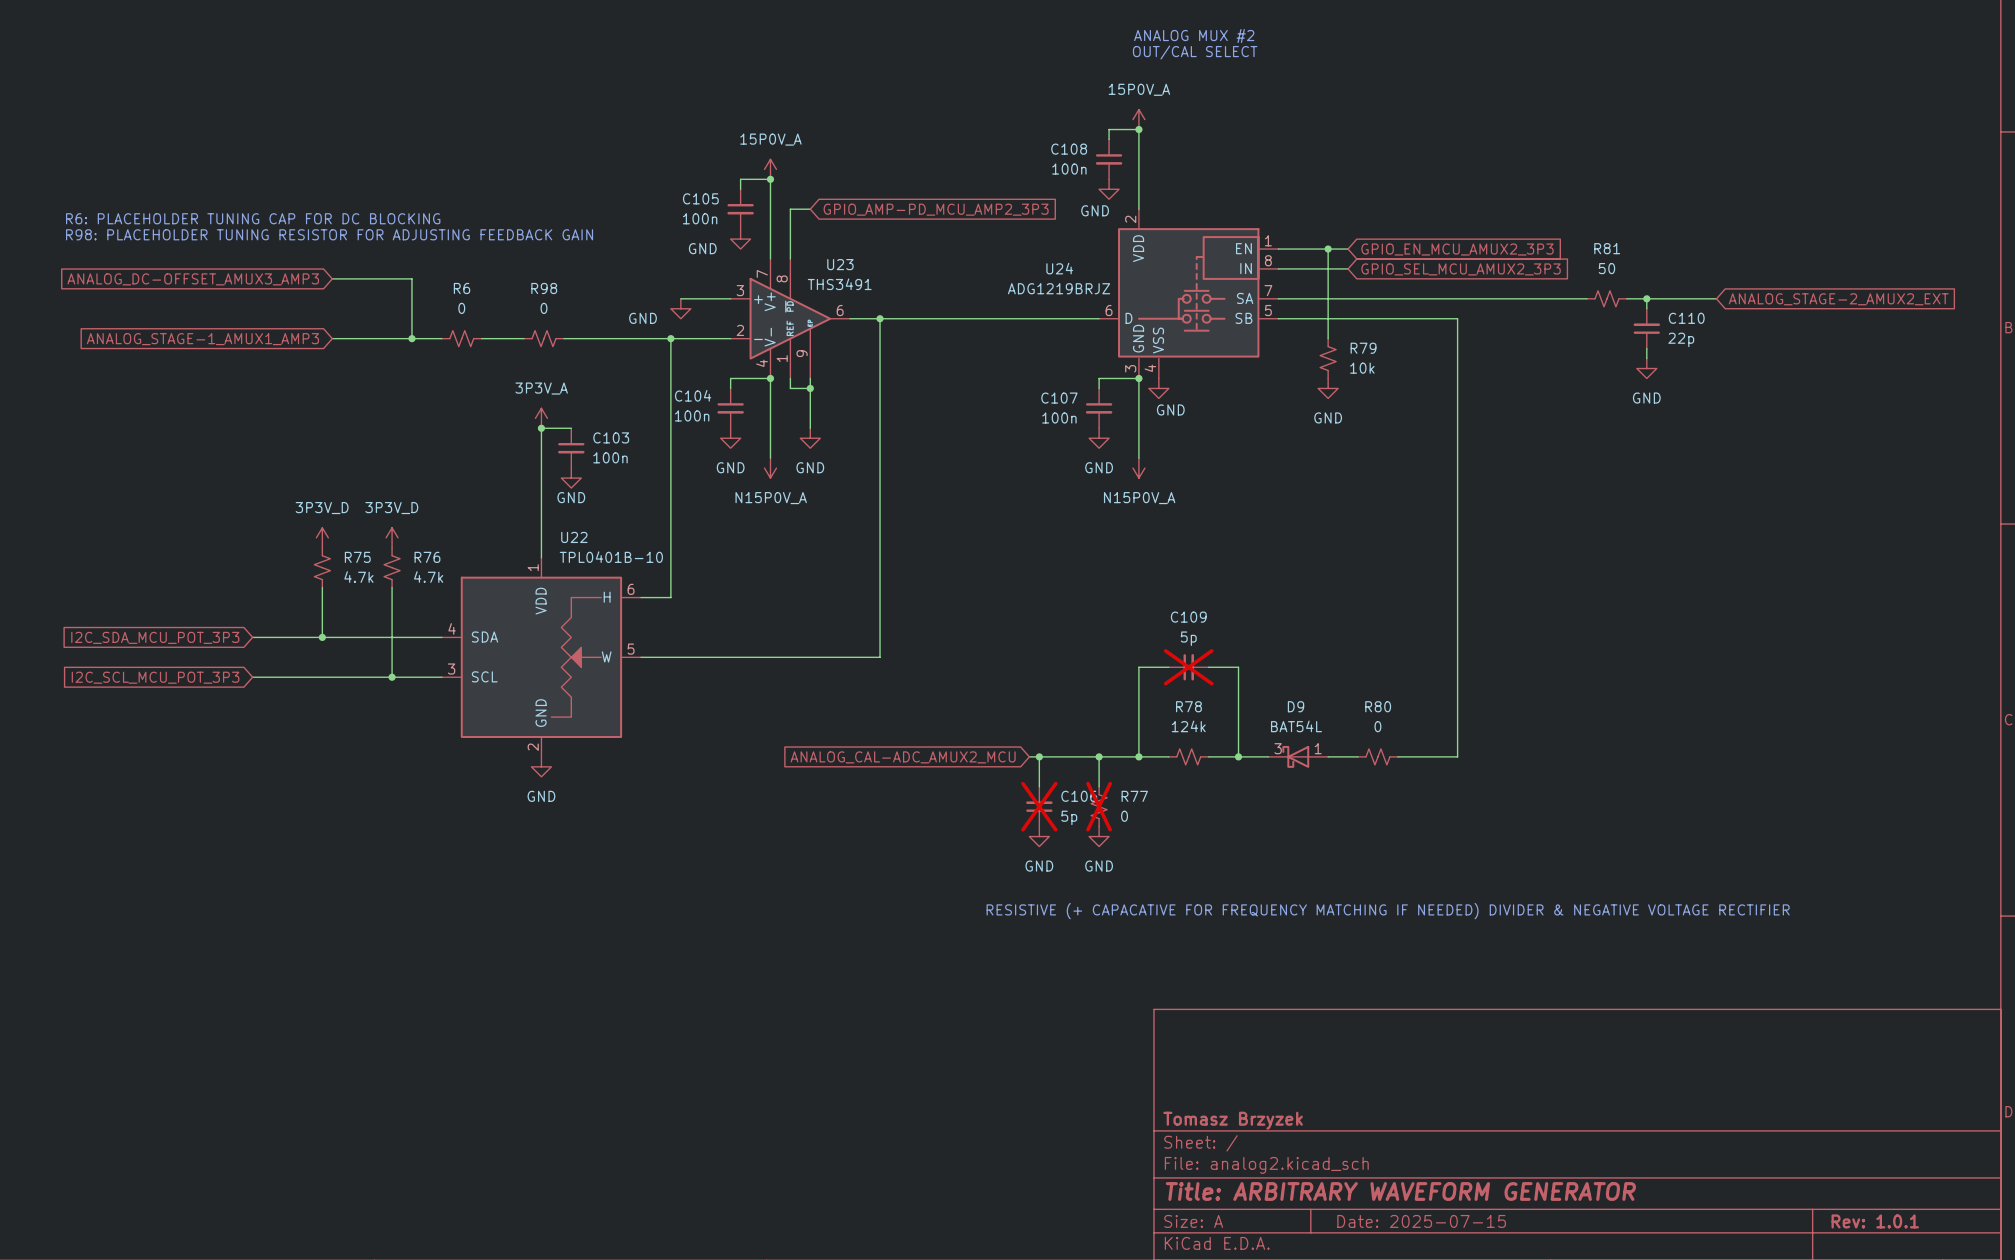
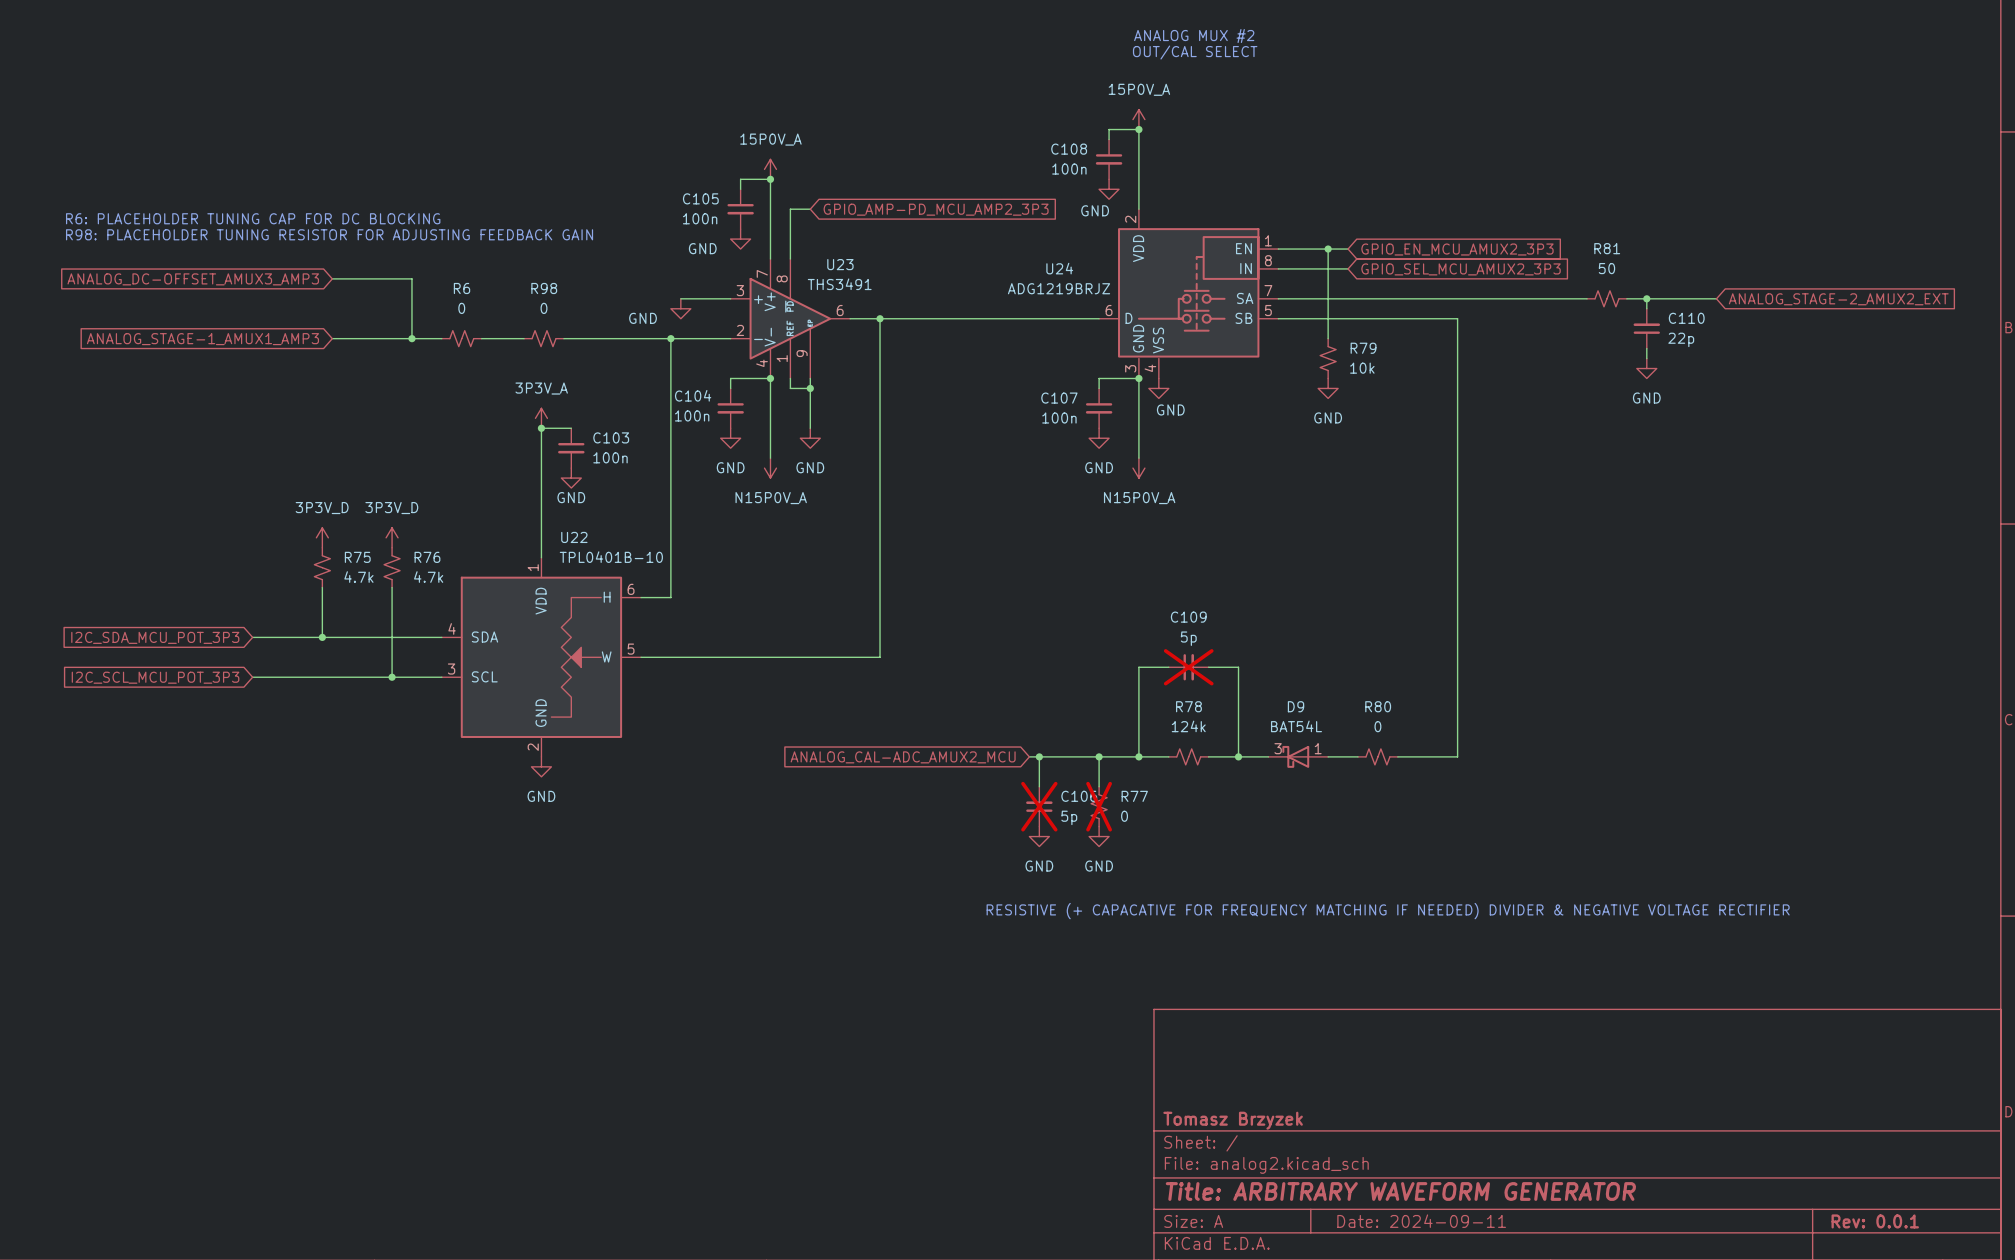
title block: Date: 2025-07-15 (1421, 1221) -> Date: 2024-09-11 (1421, 1221)
title block: Rev: 1.0.1 (1875, 1221) -> Rev: 0.0.1 (1875, 1221)

